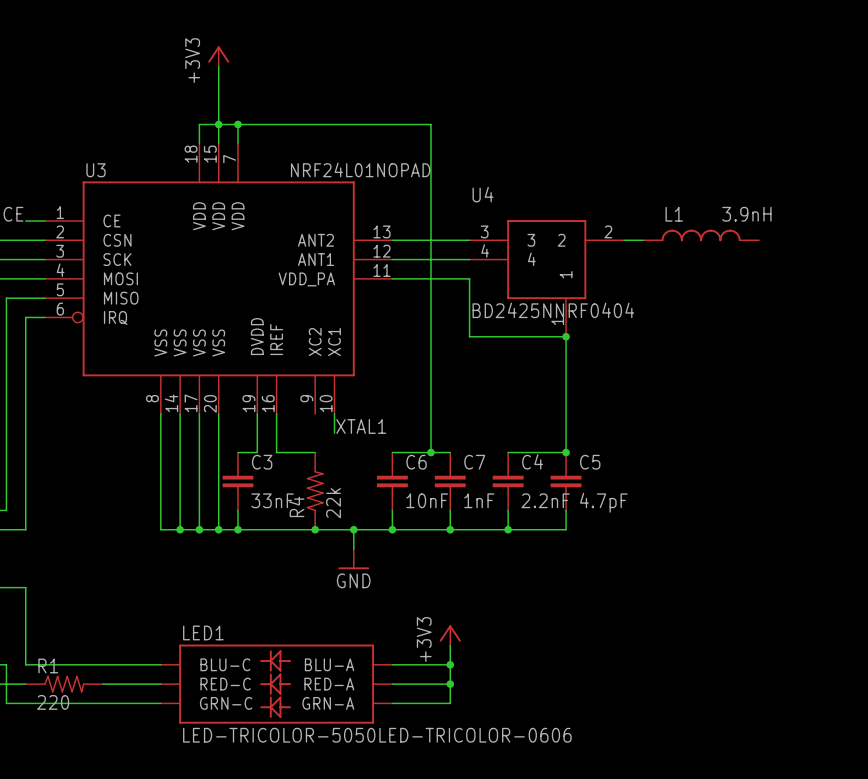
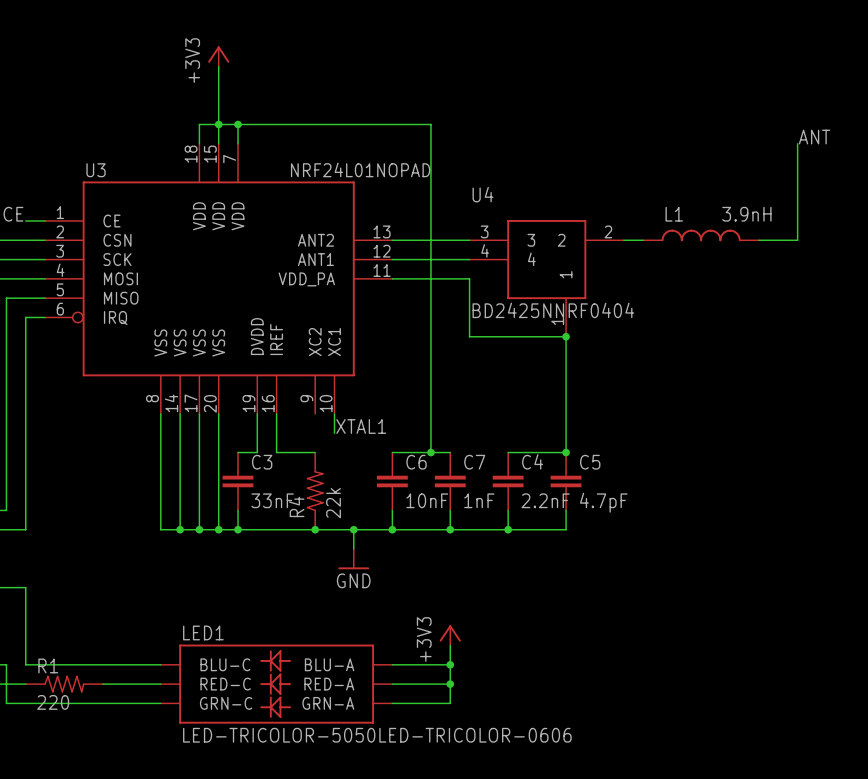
label: none -> ANT (814, 137)
wire: none -> (797, 143) (797, 240) (759, 240)

